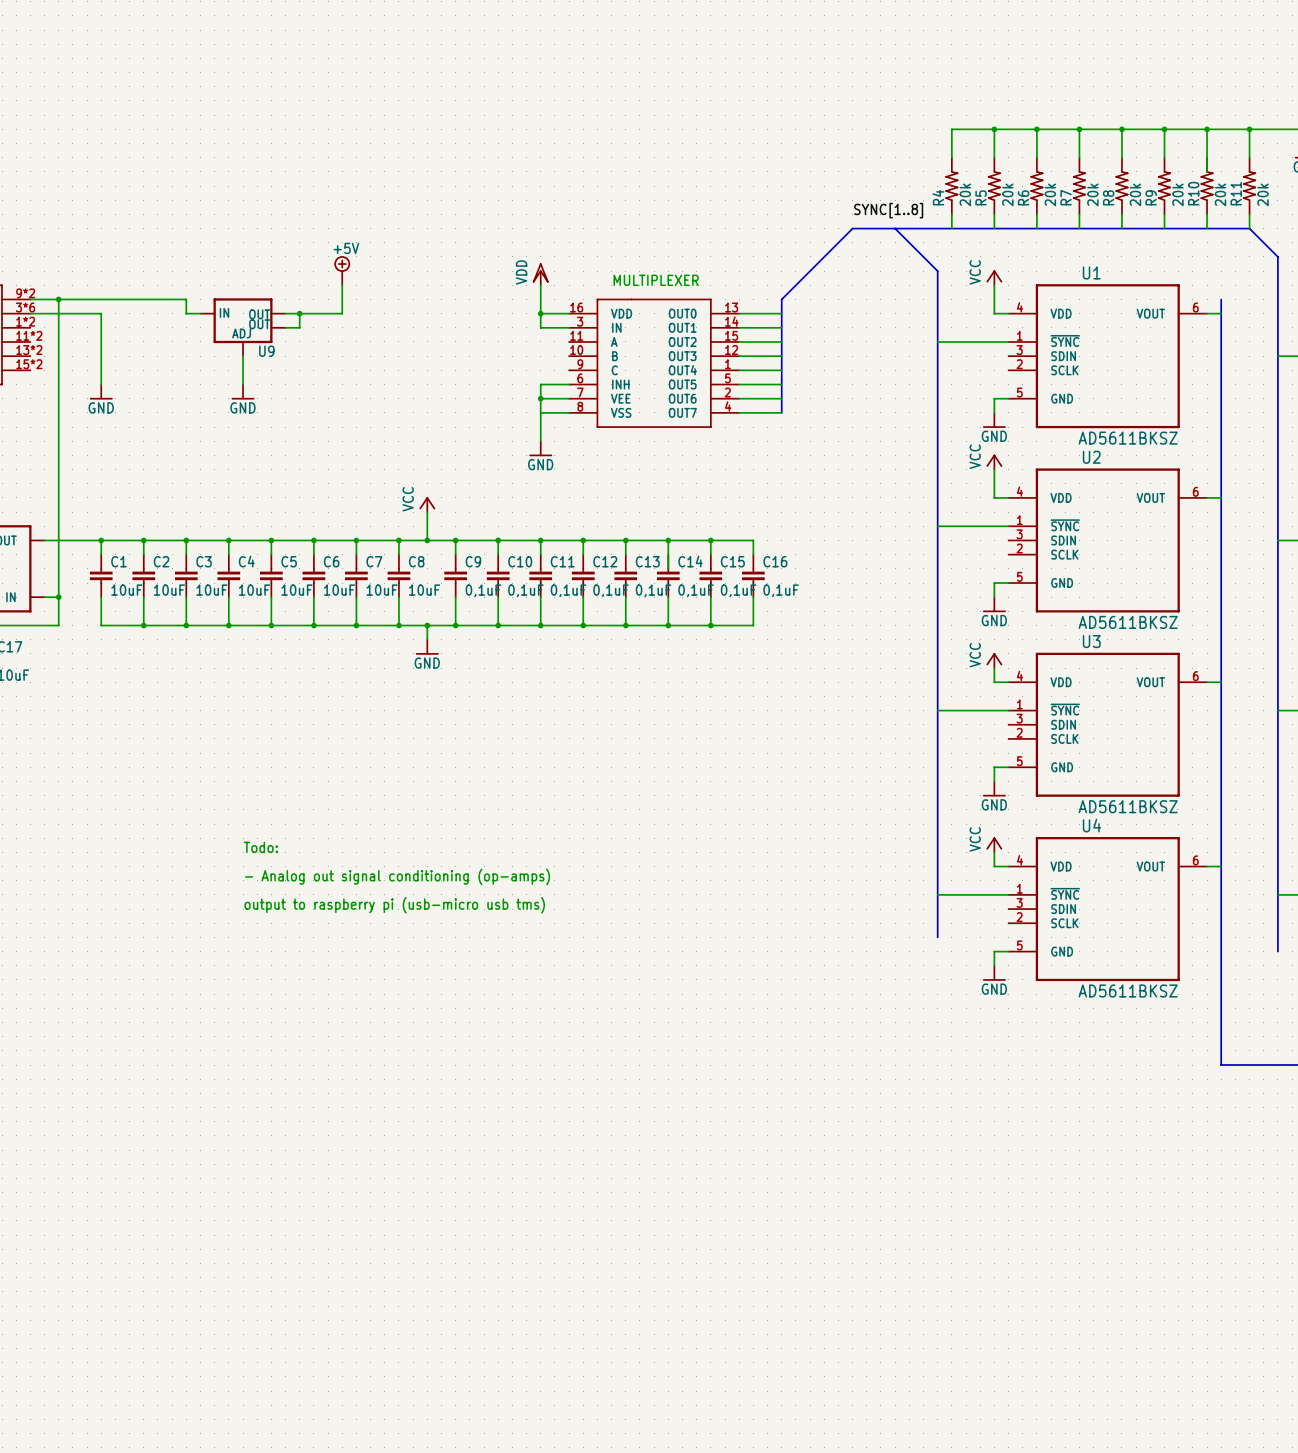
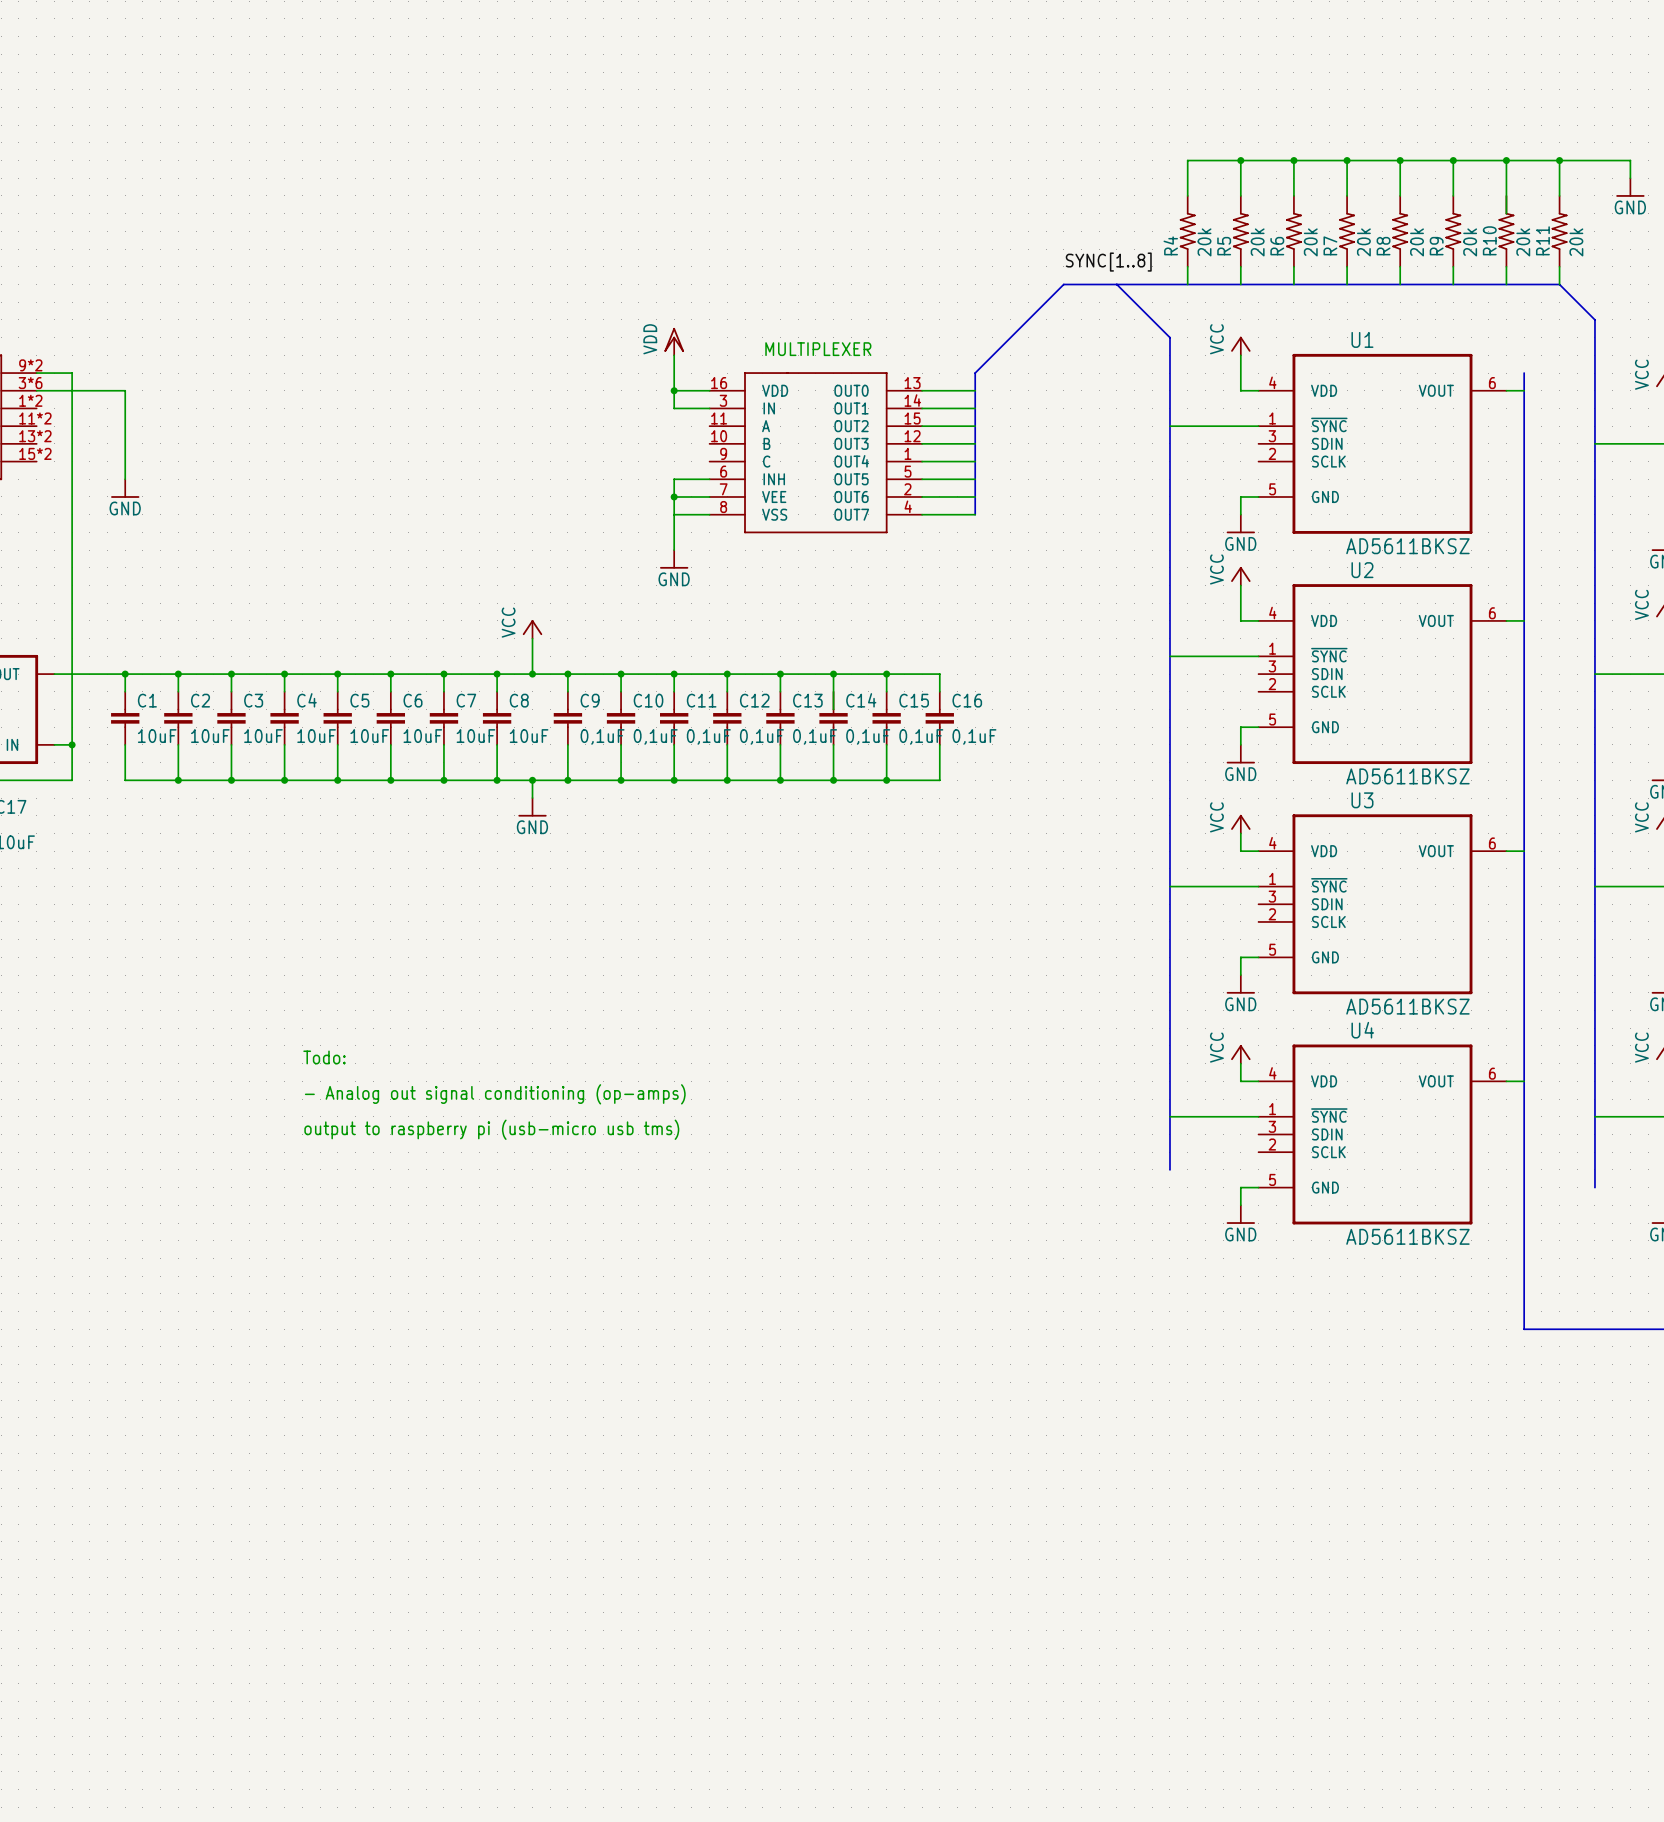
power symbol: +5V (342, 270) -> none
wire: (342, 285) (342, 313) (285, 313) -> none
wire: (58, 299) (186, 299) (186, 313) (200, 313) -> none
junction: (58, 299) -> none
wire: (299, 313) (299, 327) (285, 327) -> none
junction: (299, 313) -> none
U9: (243, 327) -> none
wire: (243, 356) (243, 384) -> none
power symbol: GND (243, 391) -> none

